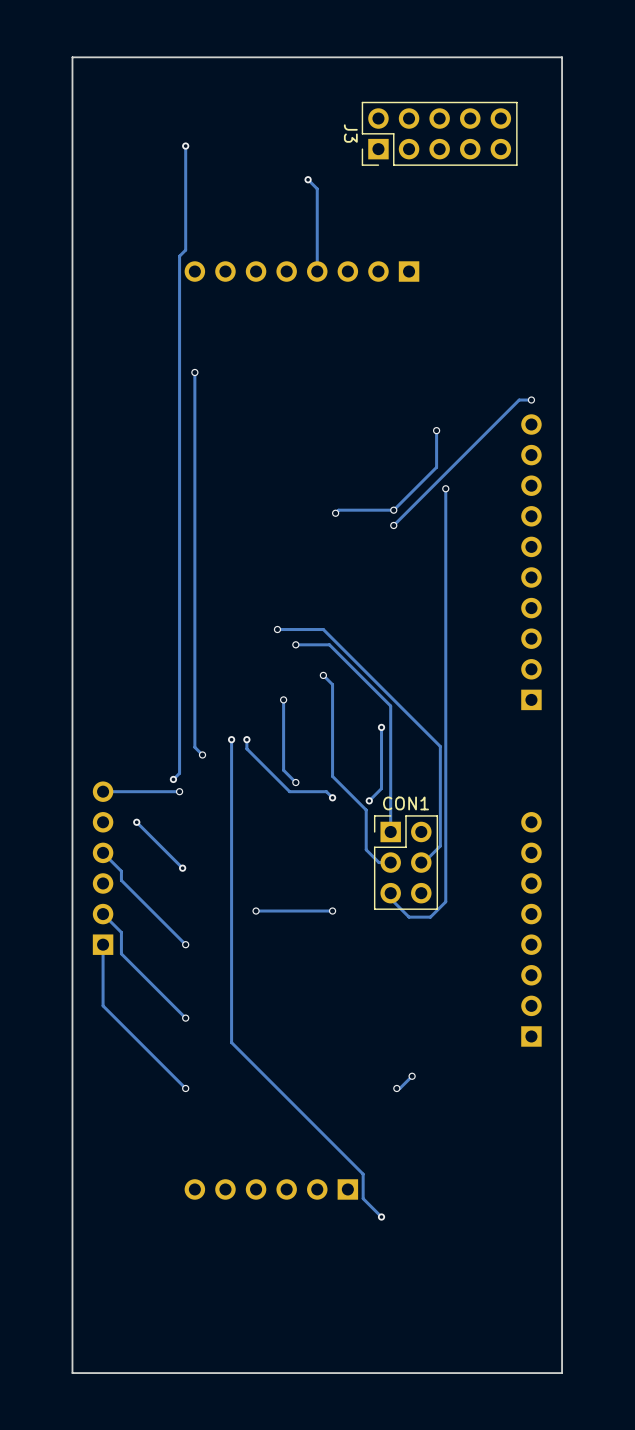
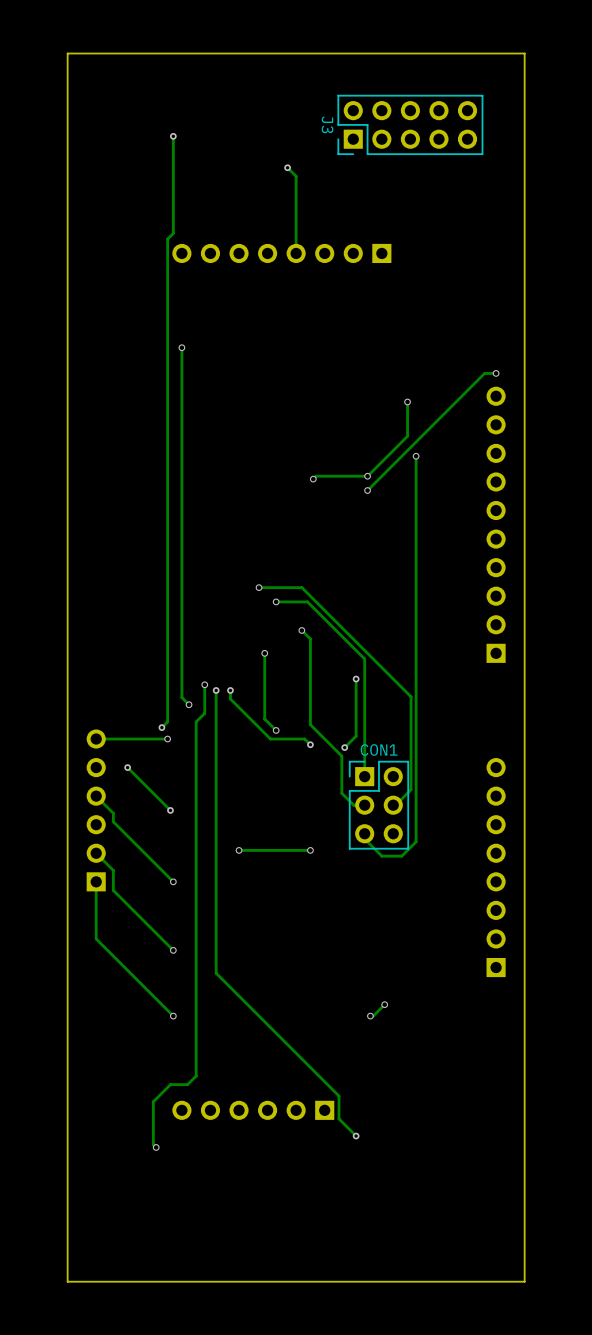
track: none -> (204, 684) (204, 713) (196, 721) (196, 1076) (187, 1084) (170, 1084) (153, 1101) (153, 1144) (156, 1147)
via: none -> (204, 684)
via: none -> (156, 1147)

